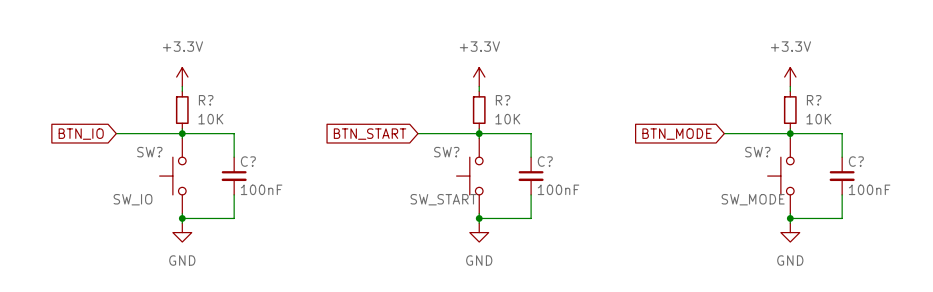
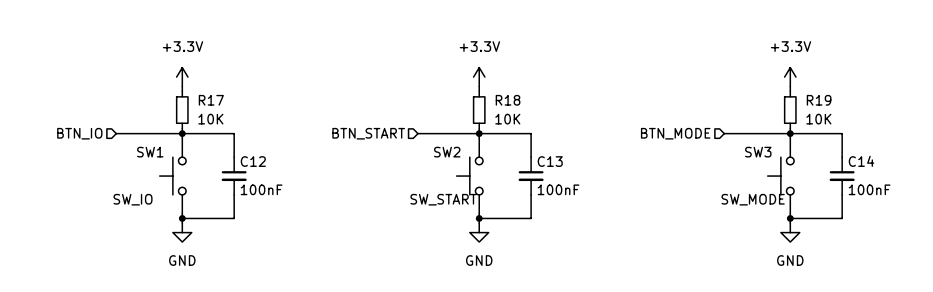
R? name: R? (206, 100) -> R17 (211, 100)
R? name: R? (503, 100) -> R18 (508, 100)
R? name: R? (814, 100) -> R19 (819, 100)
hierarchical label: none -> BTN_IO (79, 133)
hierarchical label: none -> BTN_START (368, 133)
hierarchical label: none -> BTN_MODE (675, 133)
global label: BTN_IO (81, 134) -> none
global label: BTN_START (370, 134) -> none
global label: BTN_MODE (677, 134) -> none
SW? name: SW? (149, 152) -> SW1 (150, 152)
SW? name: SW? (446, 152) -> SW2 (447, 152)
SW? name: SW? (757, 152) -> SW3 (758, 152)
C? name: C? (248, 161) -> C12 (253, 161)
C? name: C? (545, 161) -> C13 (550, 161)
C? name: C? (856, 161) -> C14 (861, 161)

